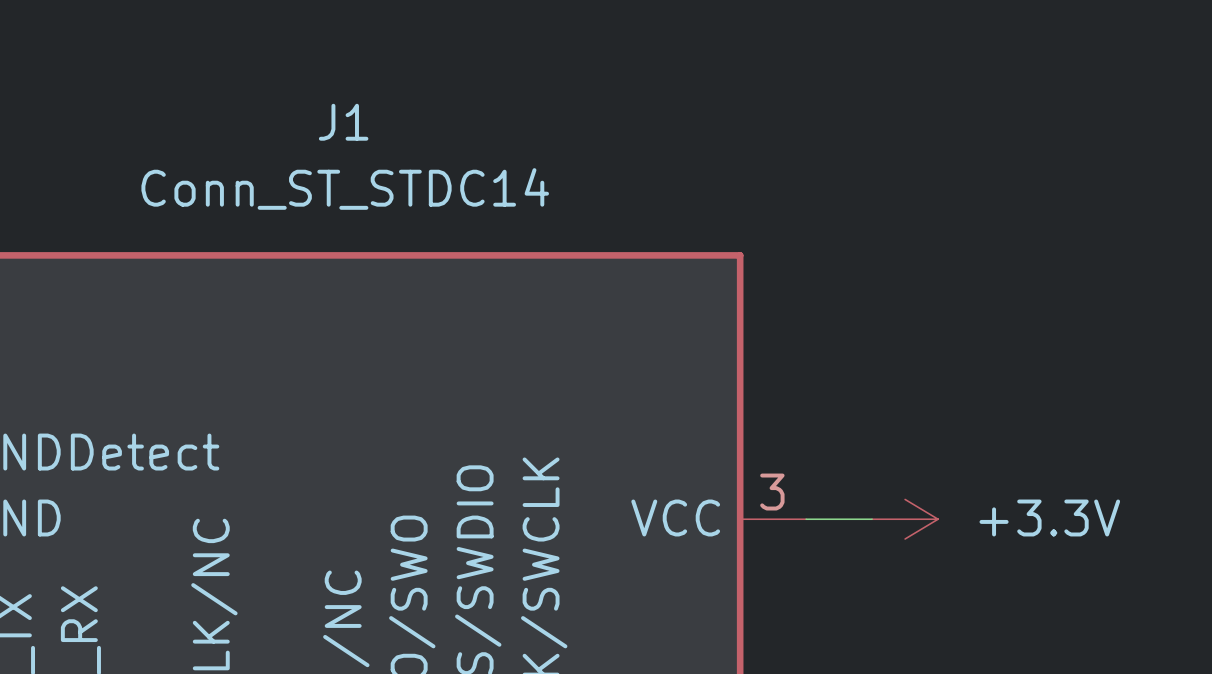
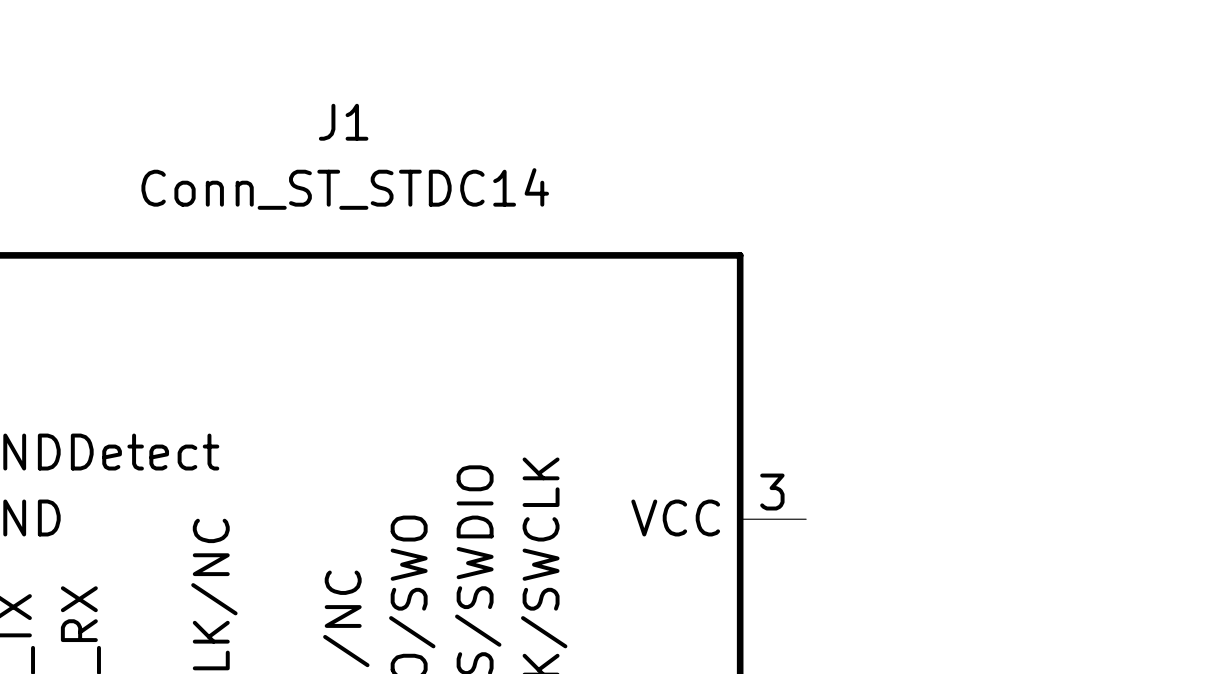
wire: (806, 519) (872, 519) -> none
power symbol: +3.3V (905, 519) -> none

